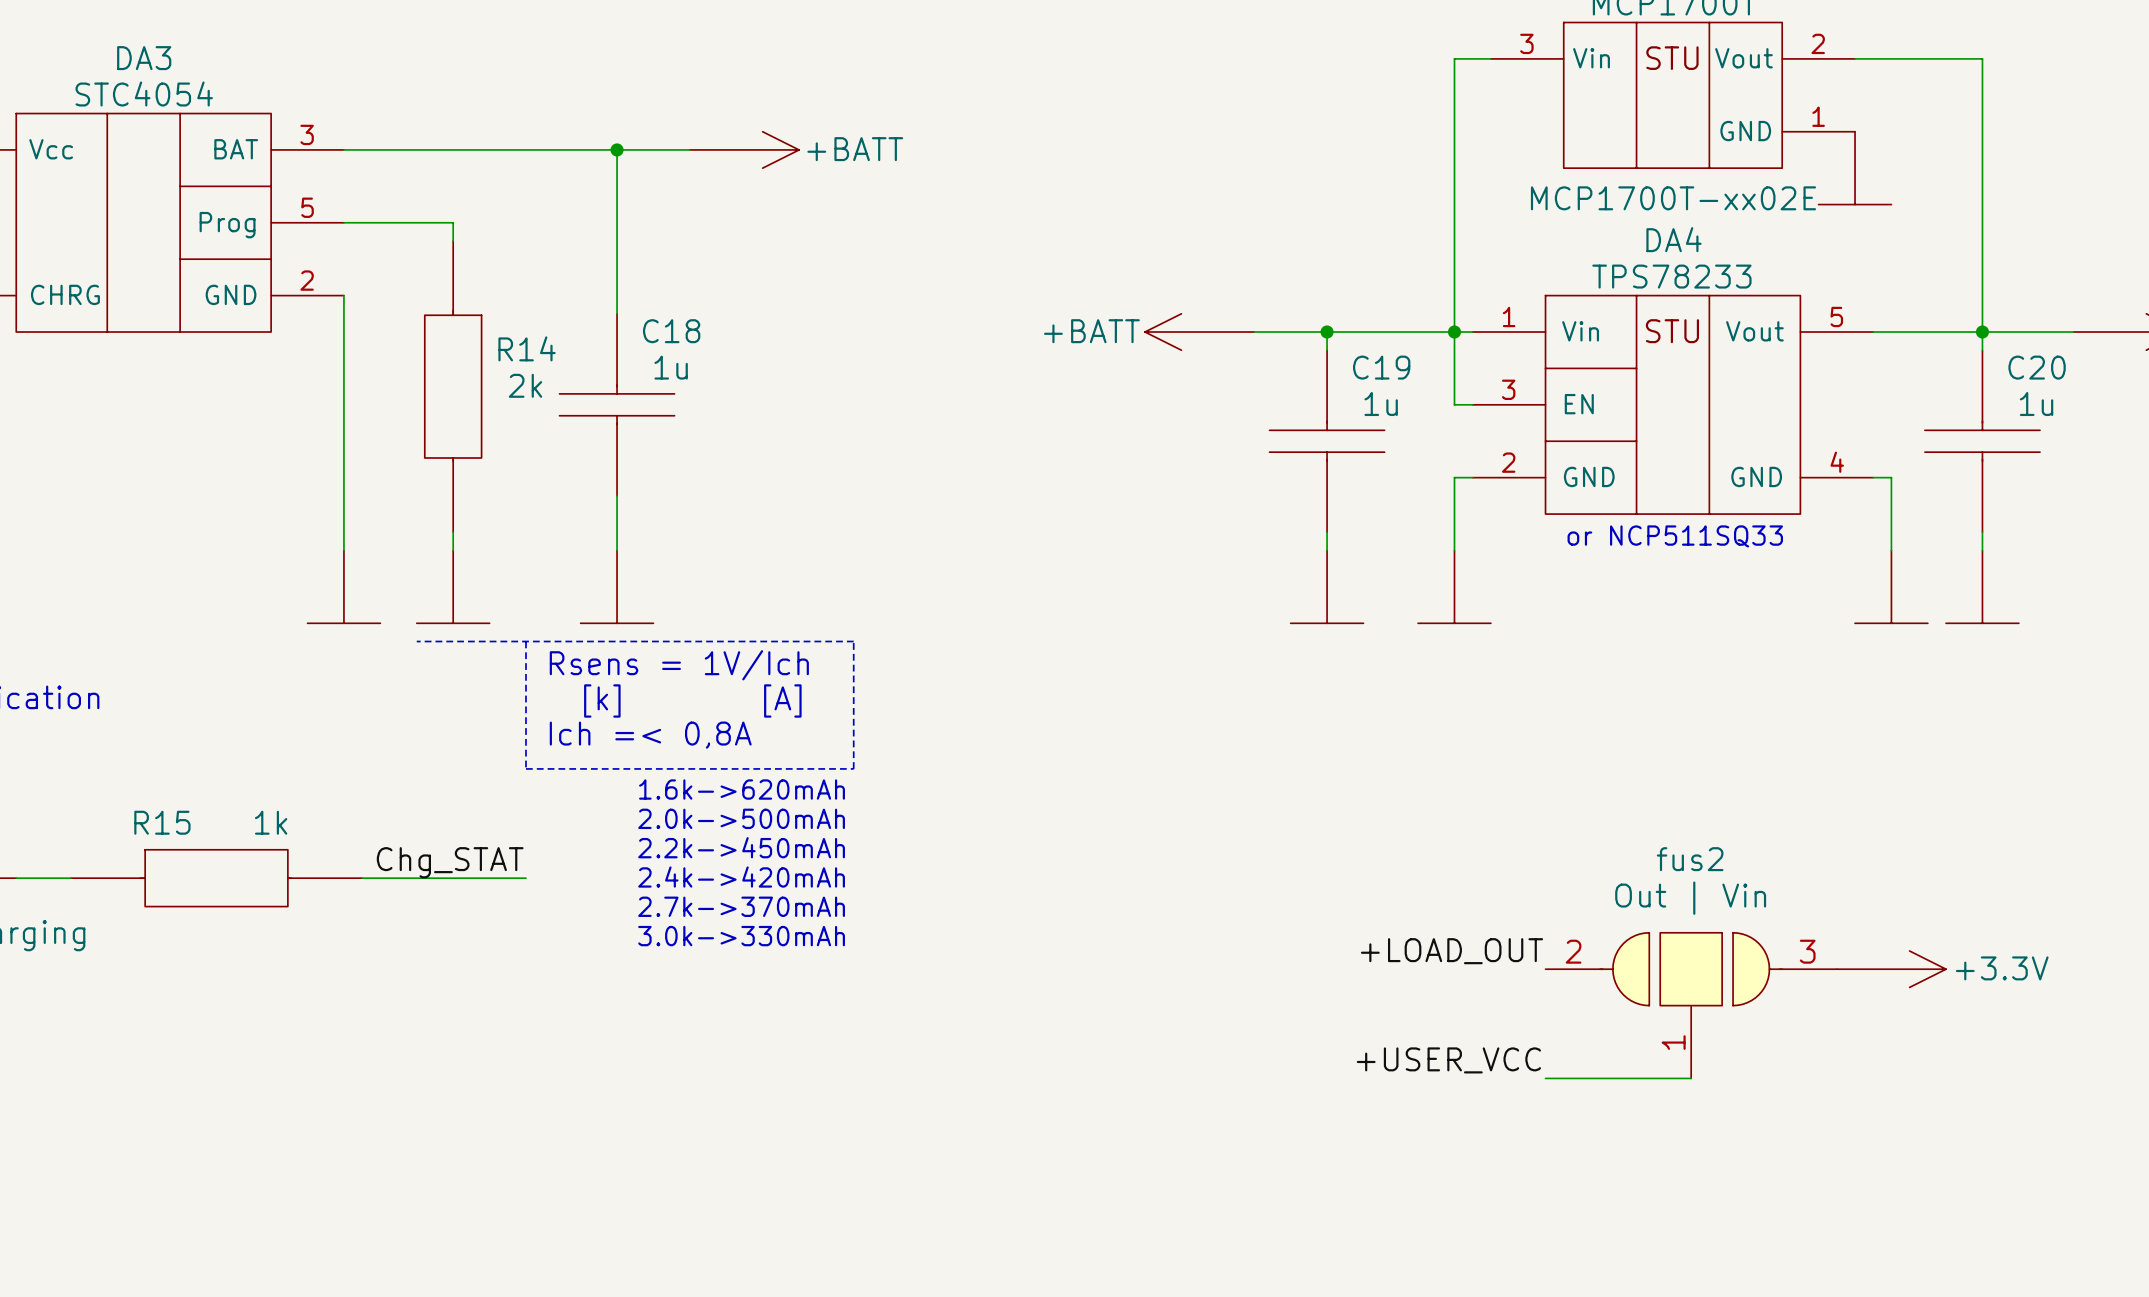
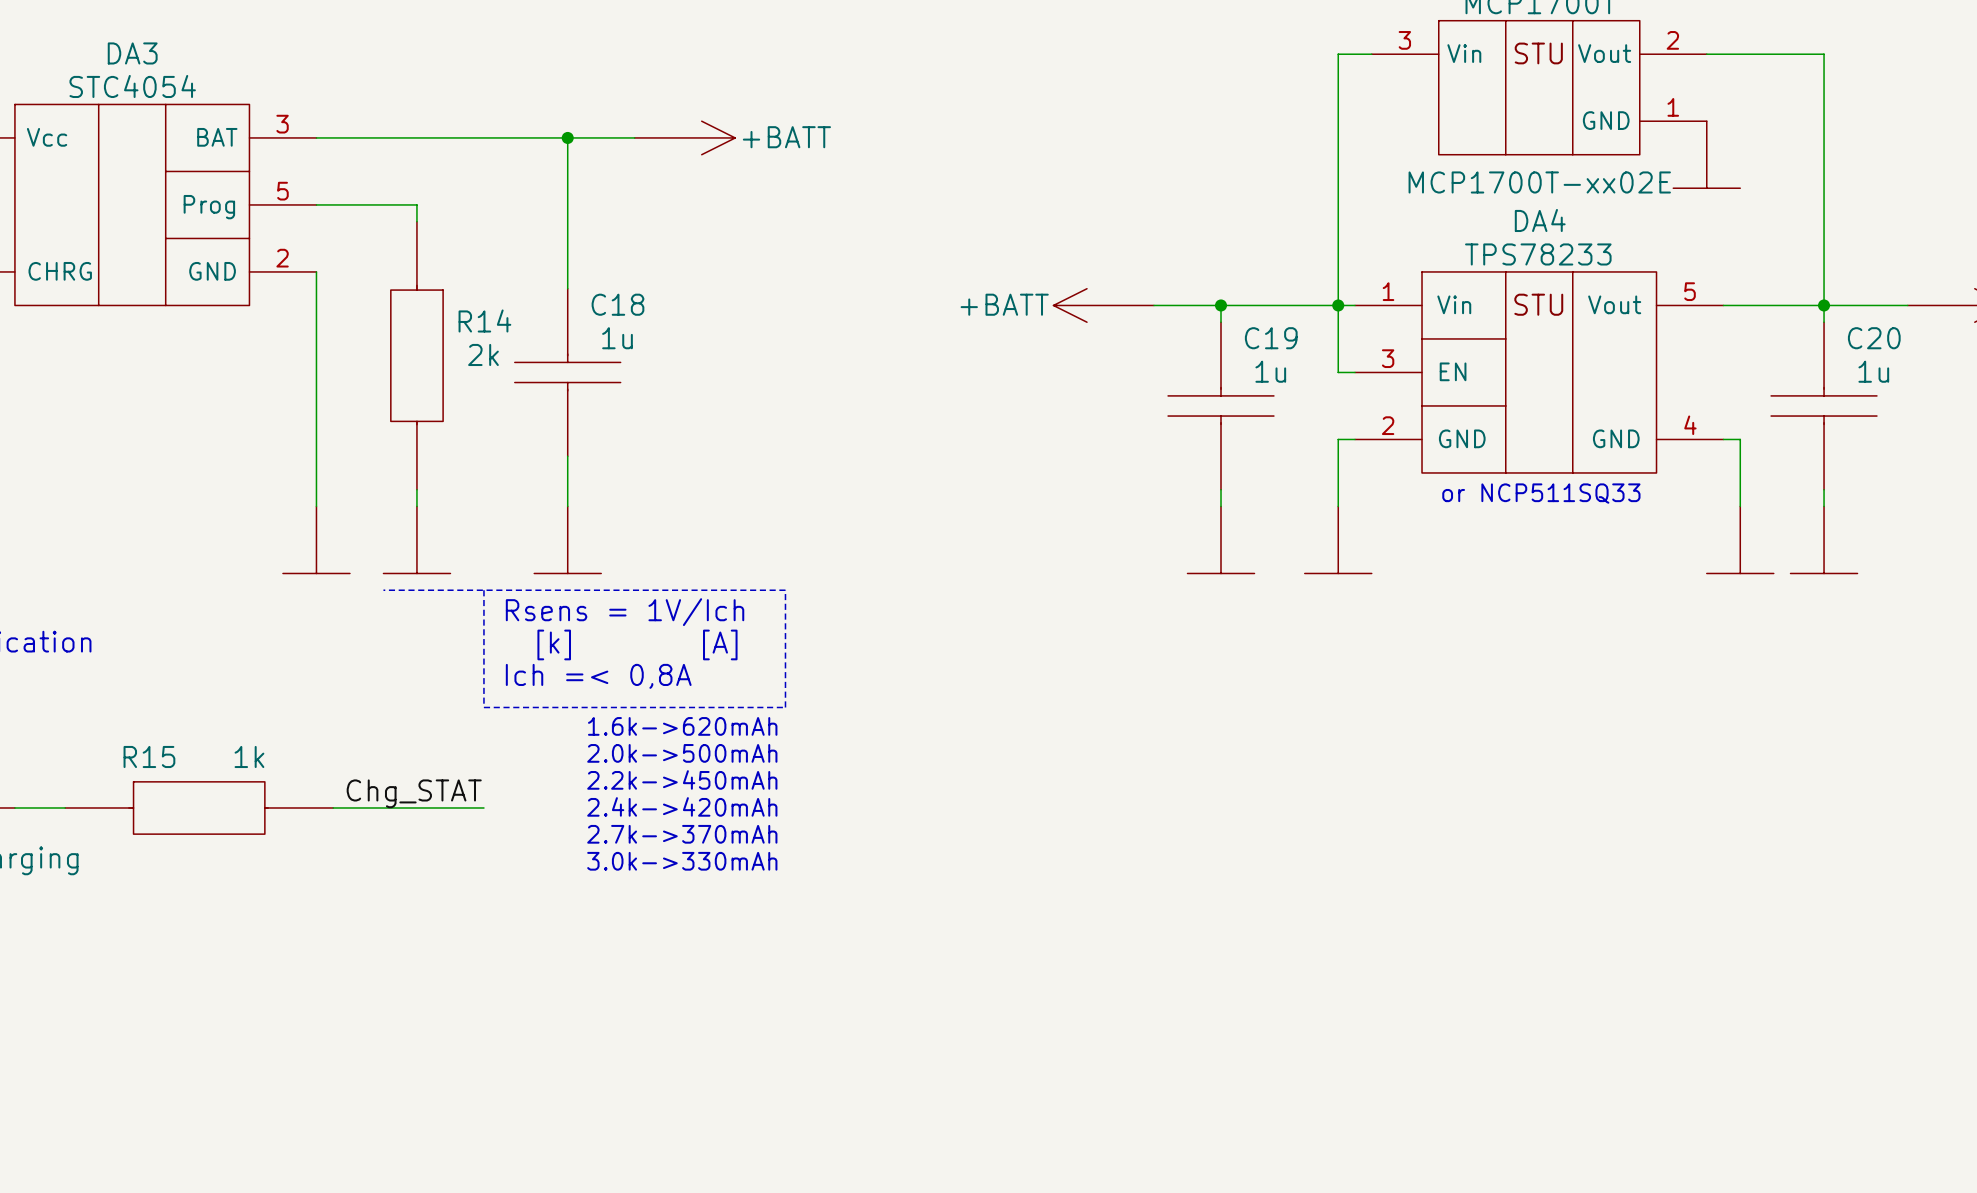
label: +LOAD_OUT (1452, 951) -> none
power symbol: +3.3V (1891, 969) -> none
fus2: Out | Vin (1691, 1005) -> none
label: +USER_VCC (1448, 1060) -> none
wire: (1545, 1078) (1691, 1078) -> none

